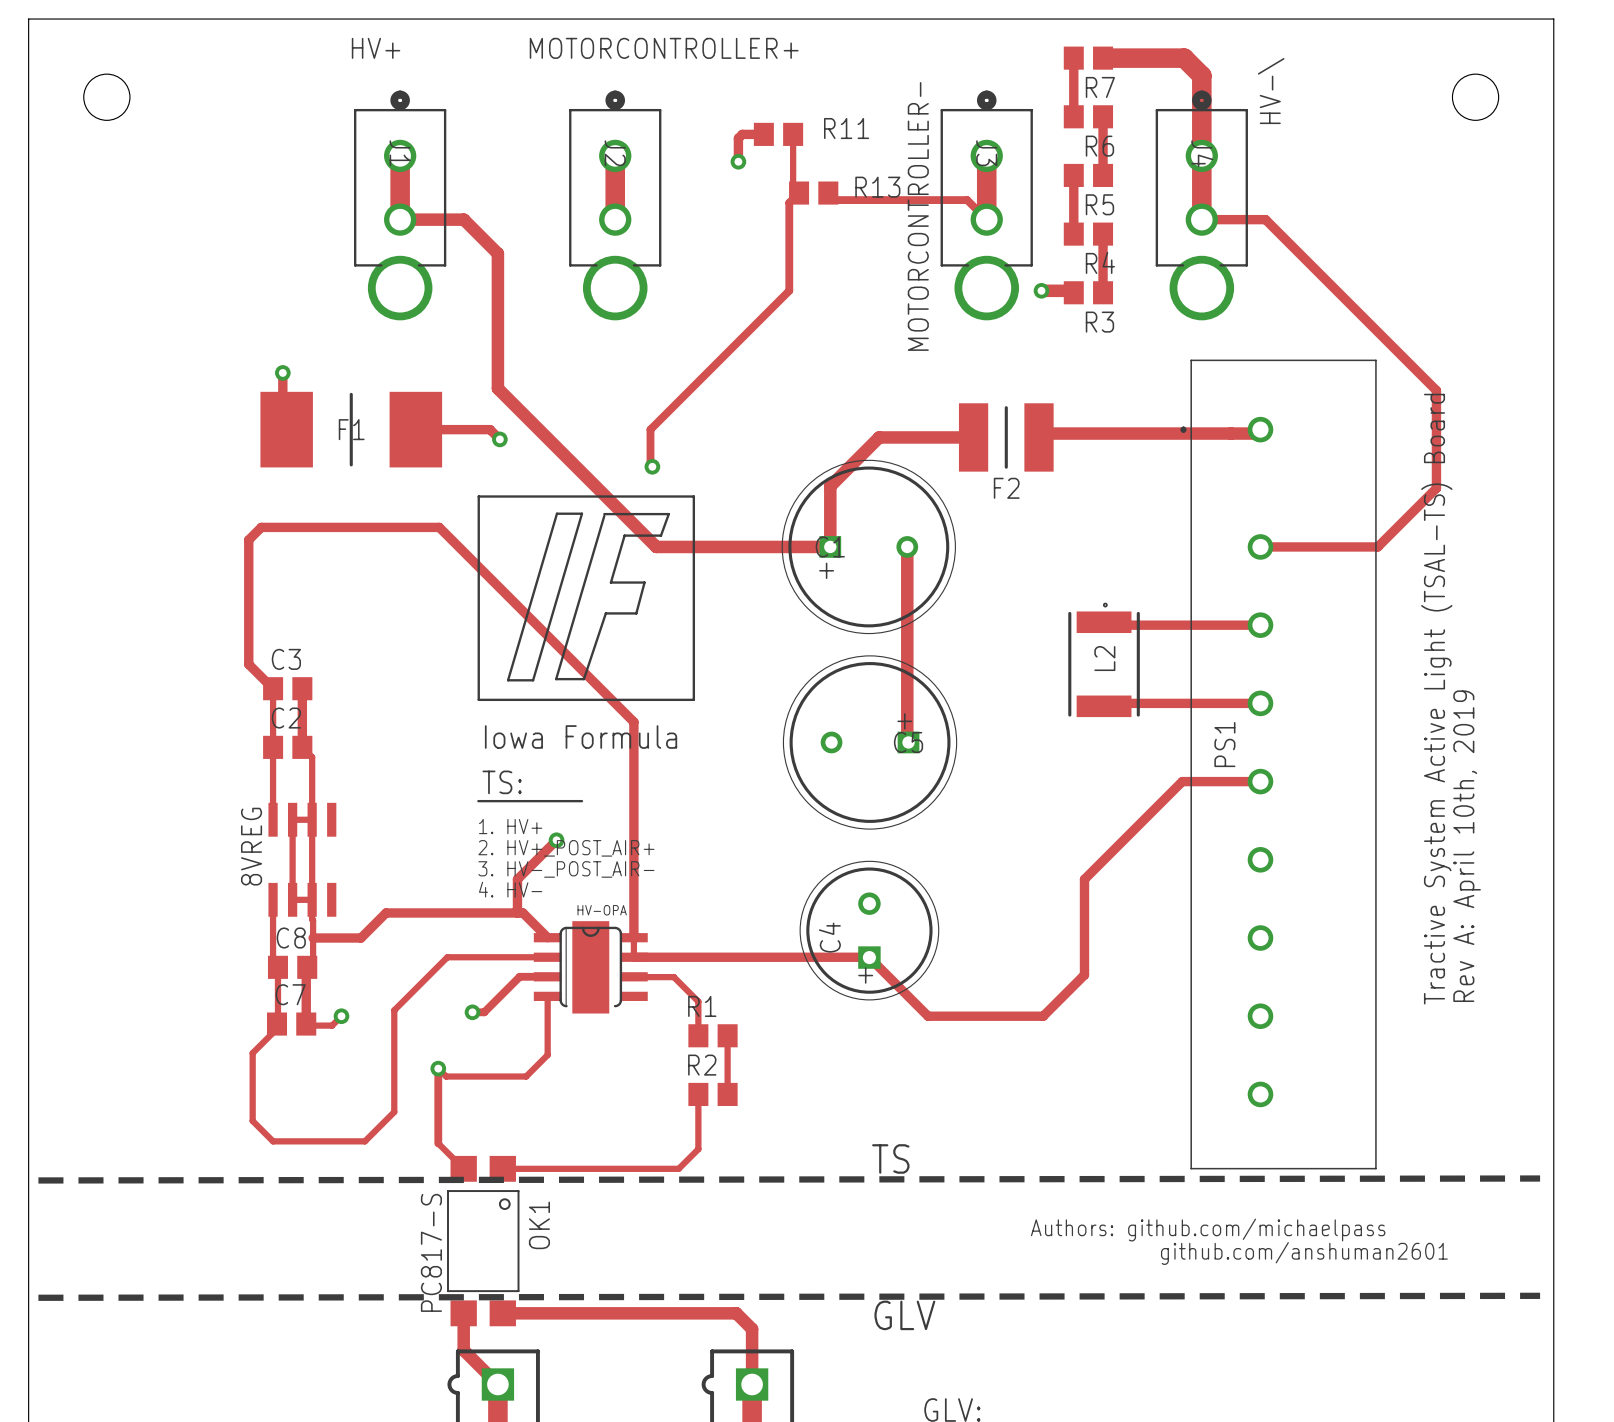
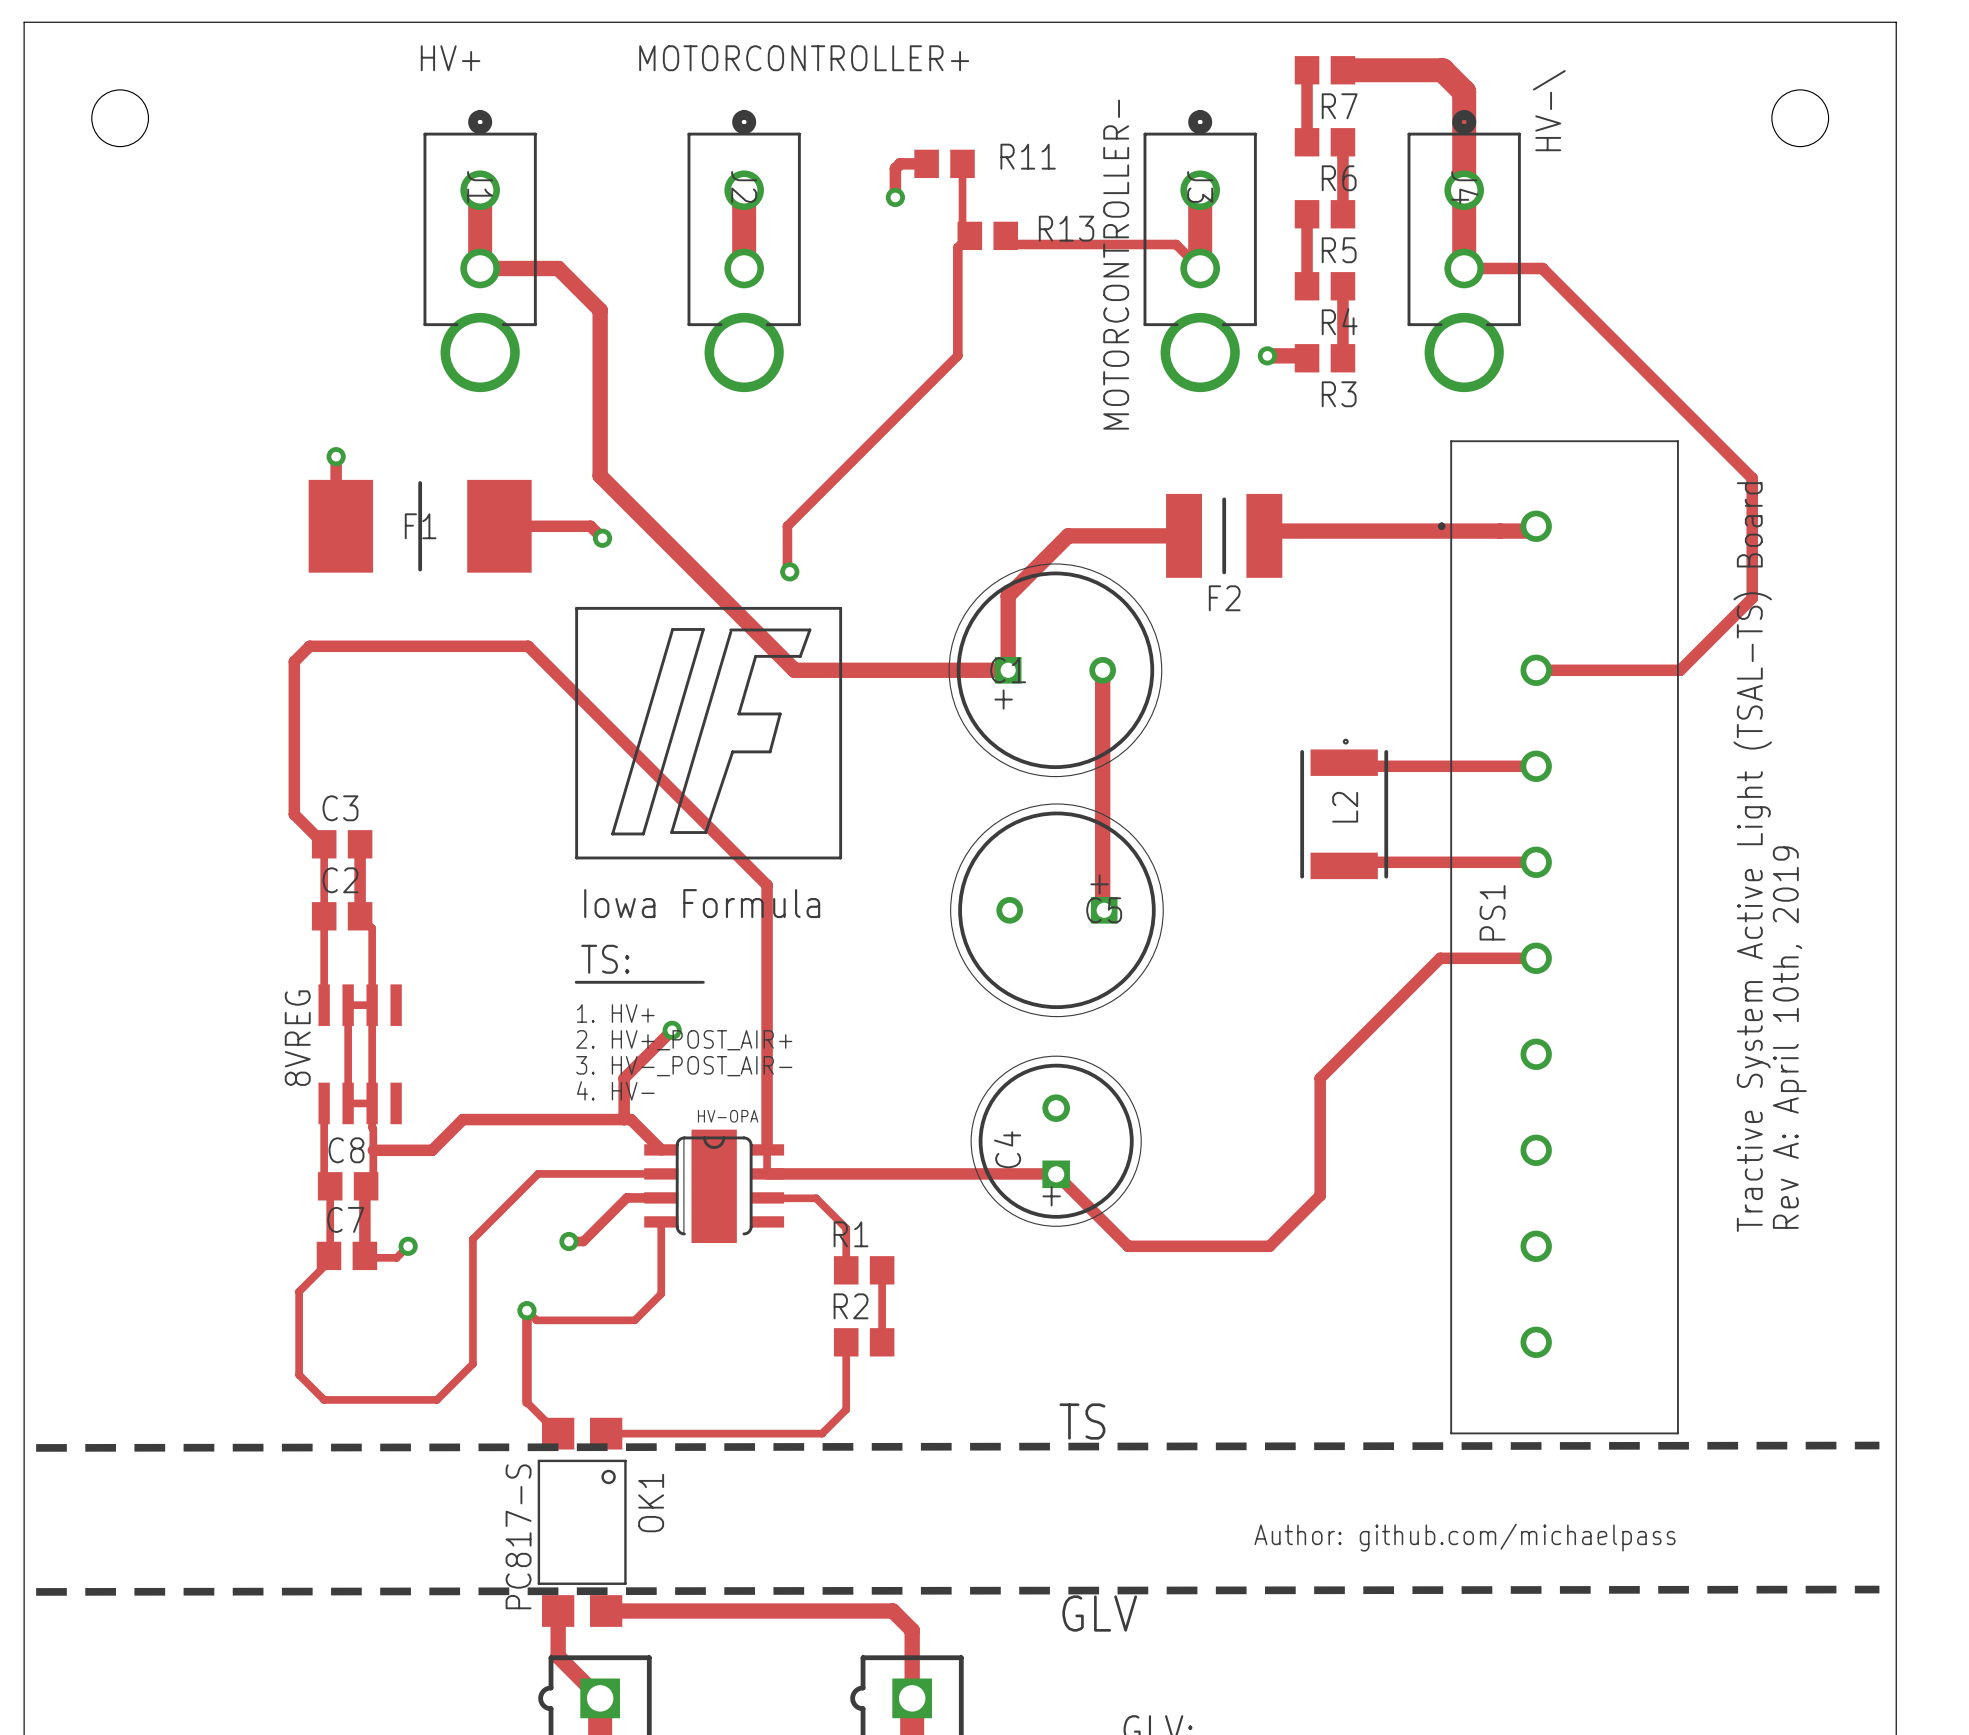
text: Authors: github.com/michaelpass (1208, 1230) -> none
text: github.com/anshuman2601 (1304, 1253) -> Author: github.com/michaelpass (1465, 1537)

